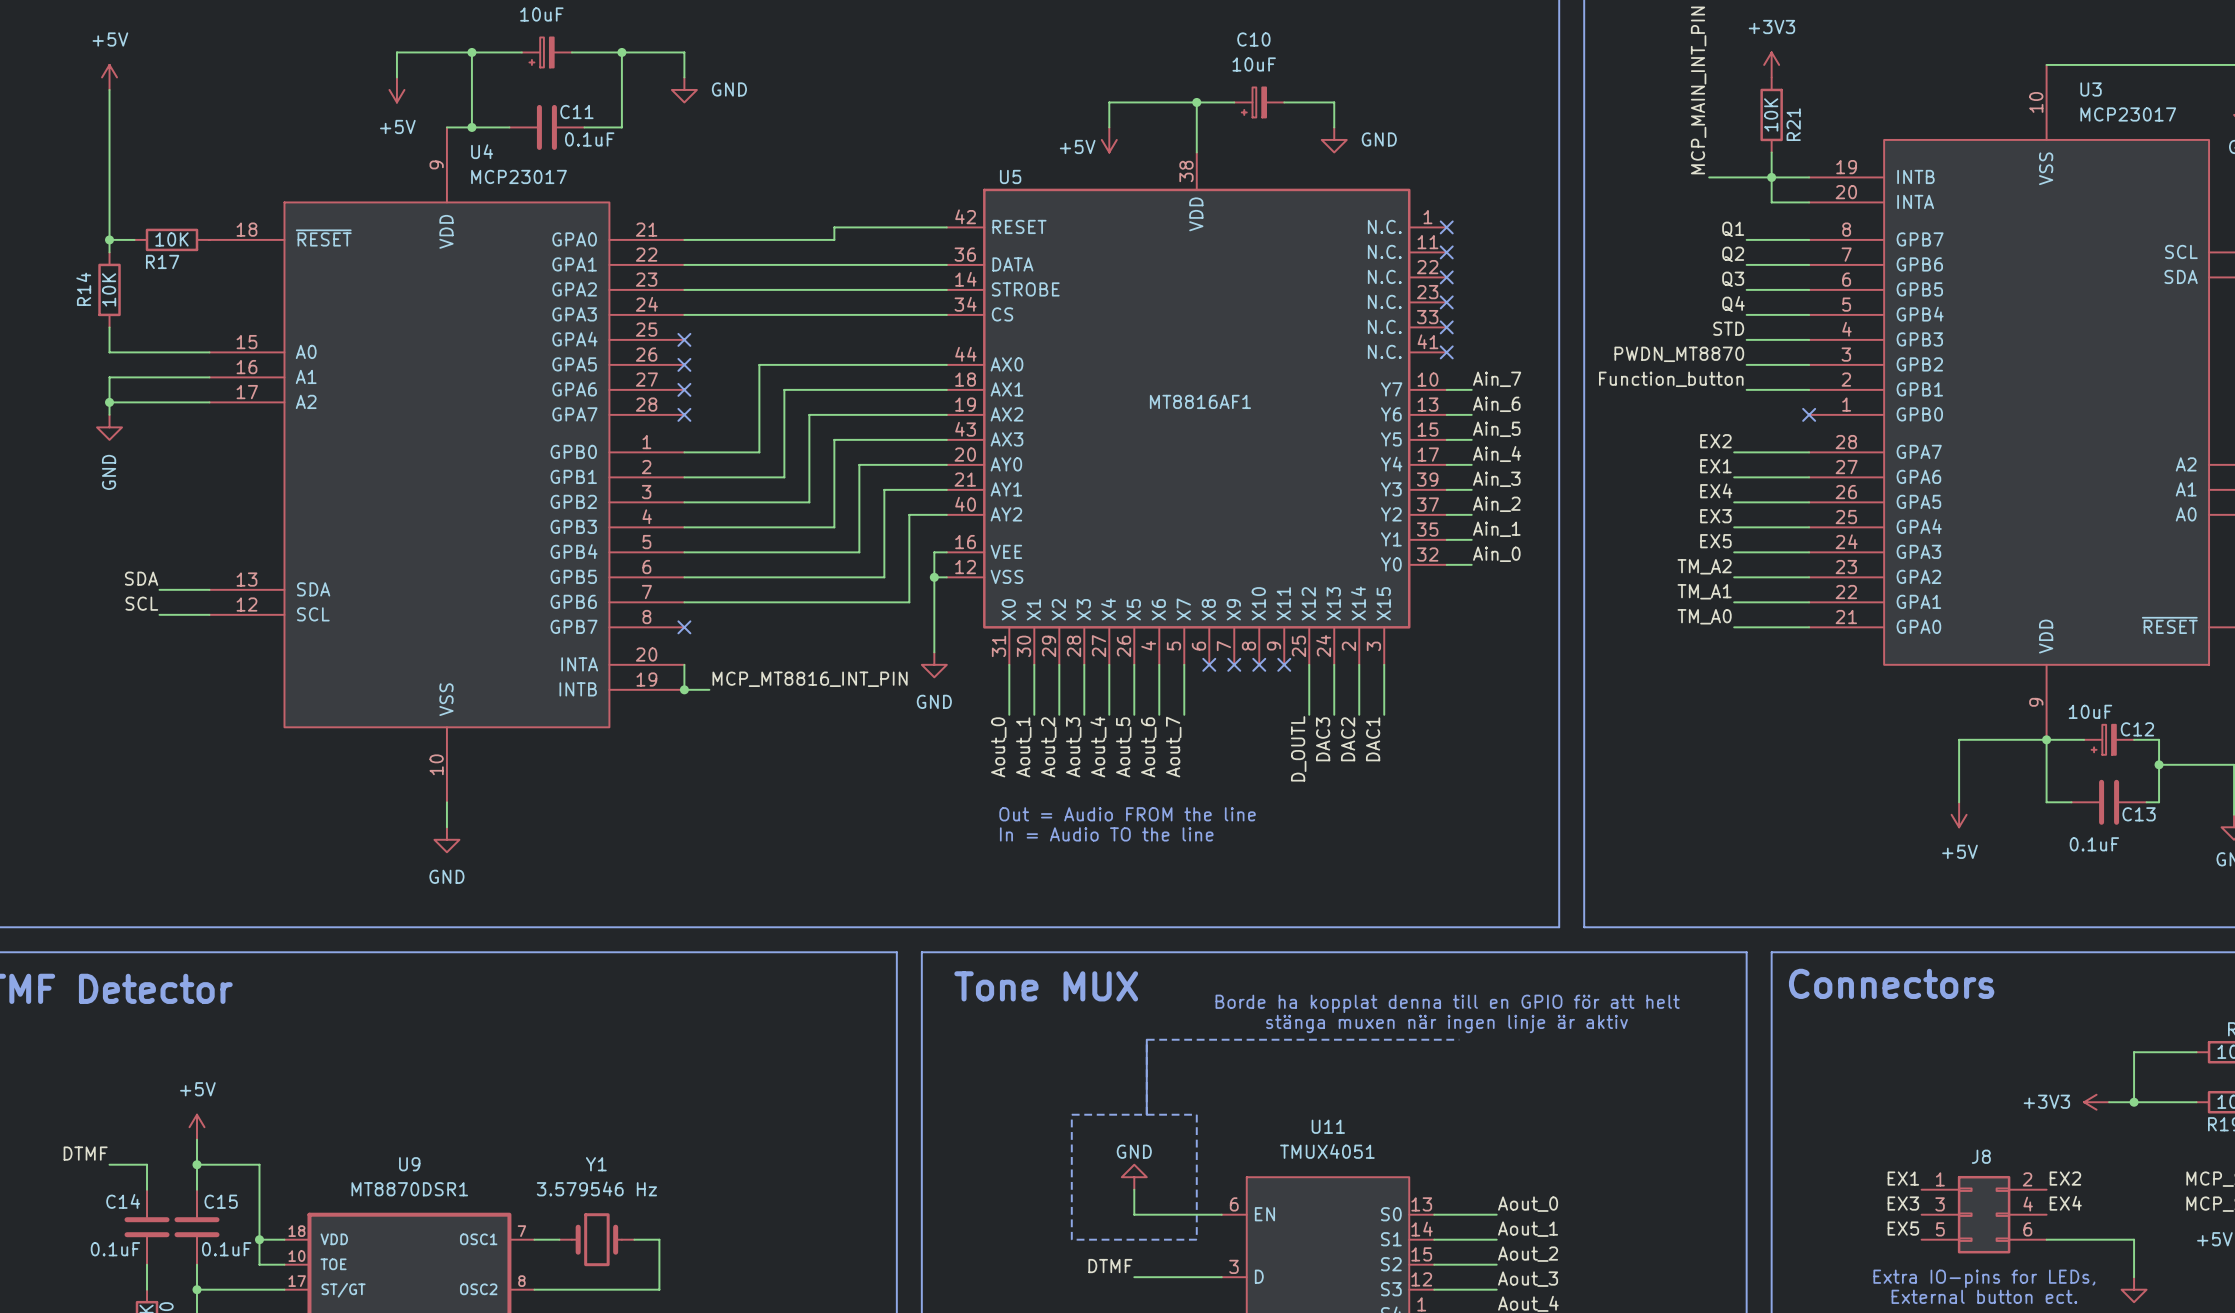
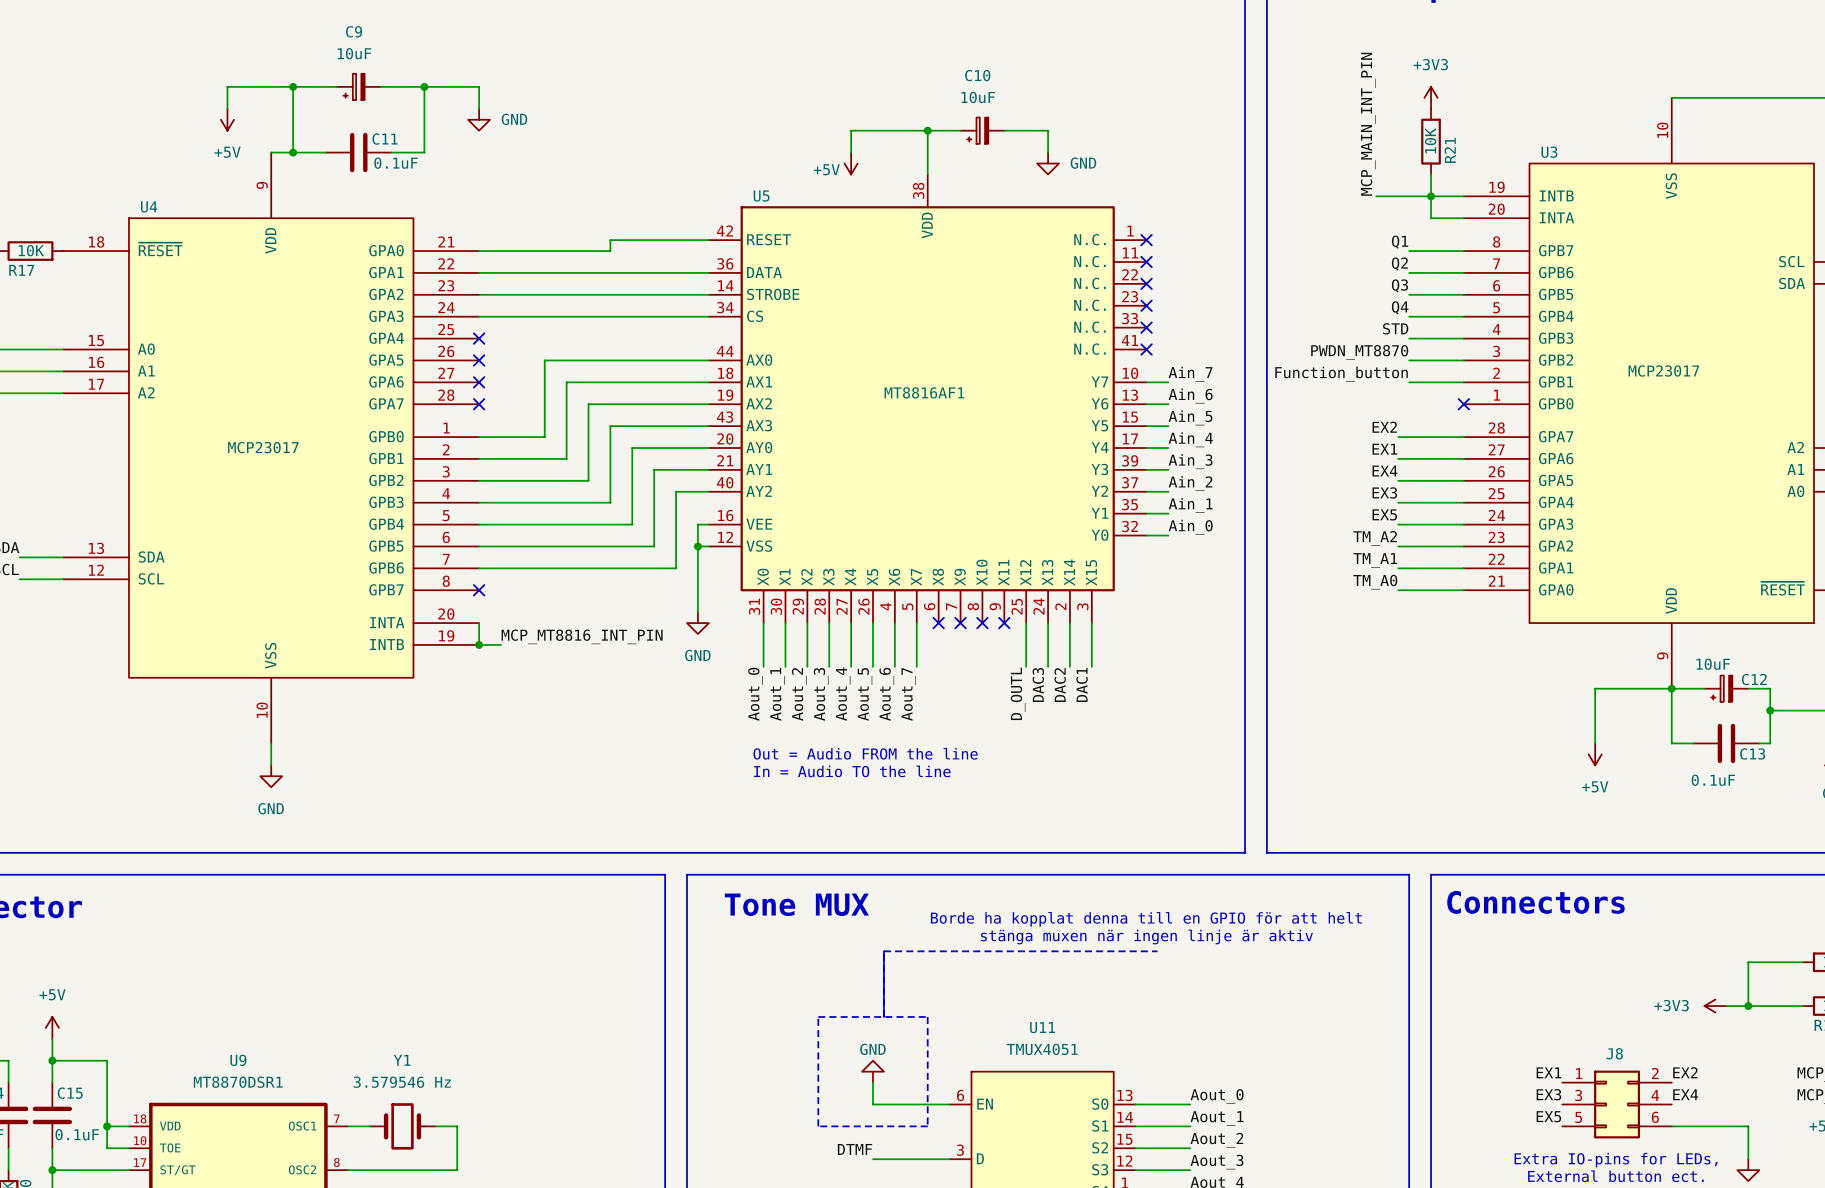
U3 name position: U3 (2091, 89) -> U3 (1549, 152)
U3 value position: MCP23017 (2128, 114) -> MCP23017 (1663, 371)
U4 name position: U4 (482, 151) -> U4 (149, 206)
U4 value position: MCP23017 (519, 176) -> MCP23017 (263, 447)

